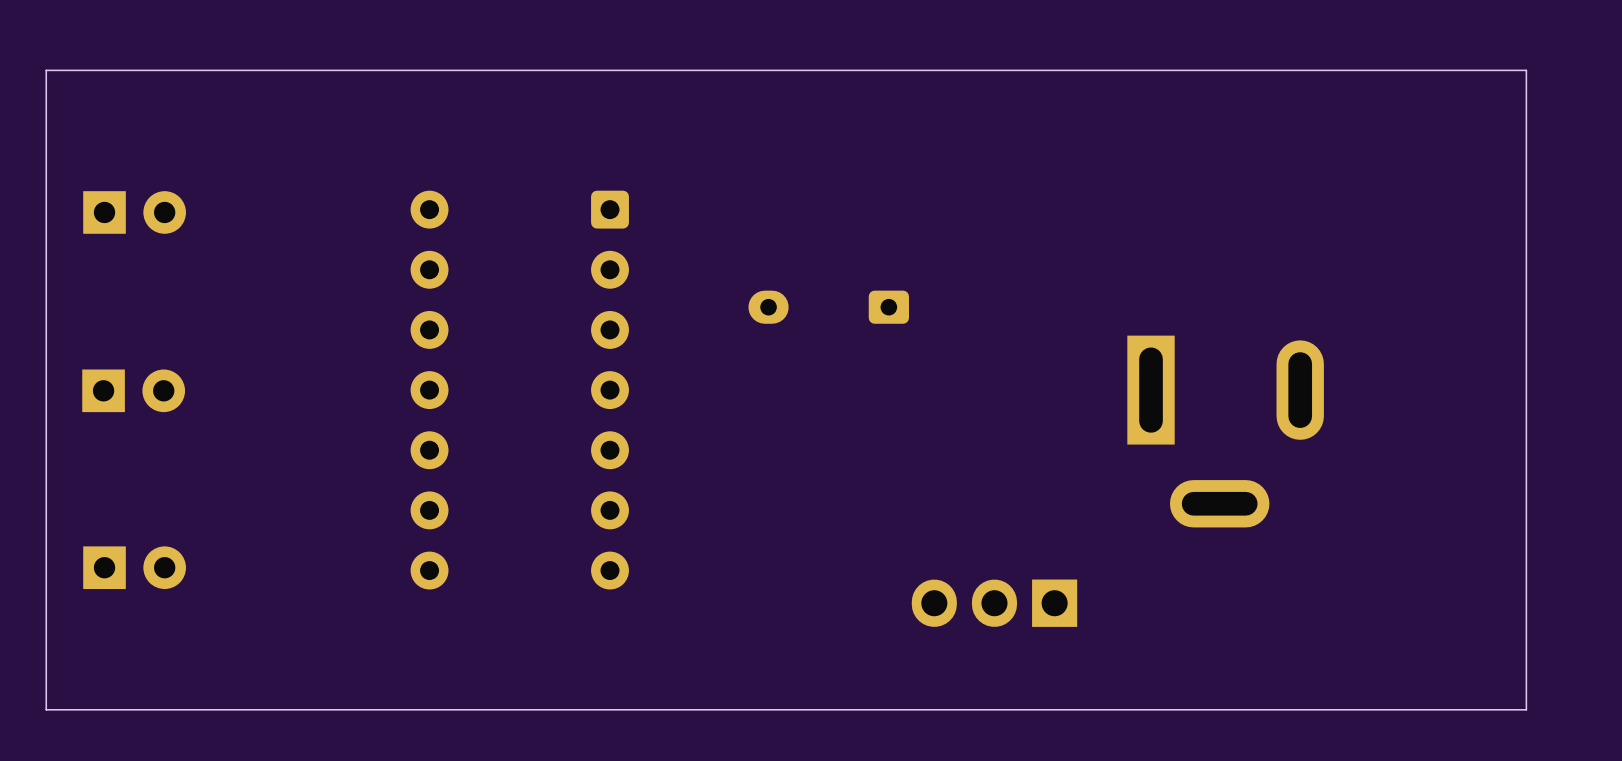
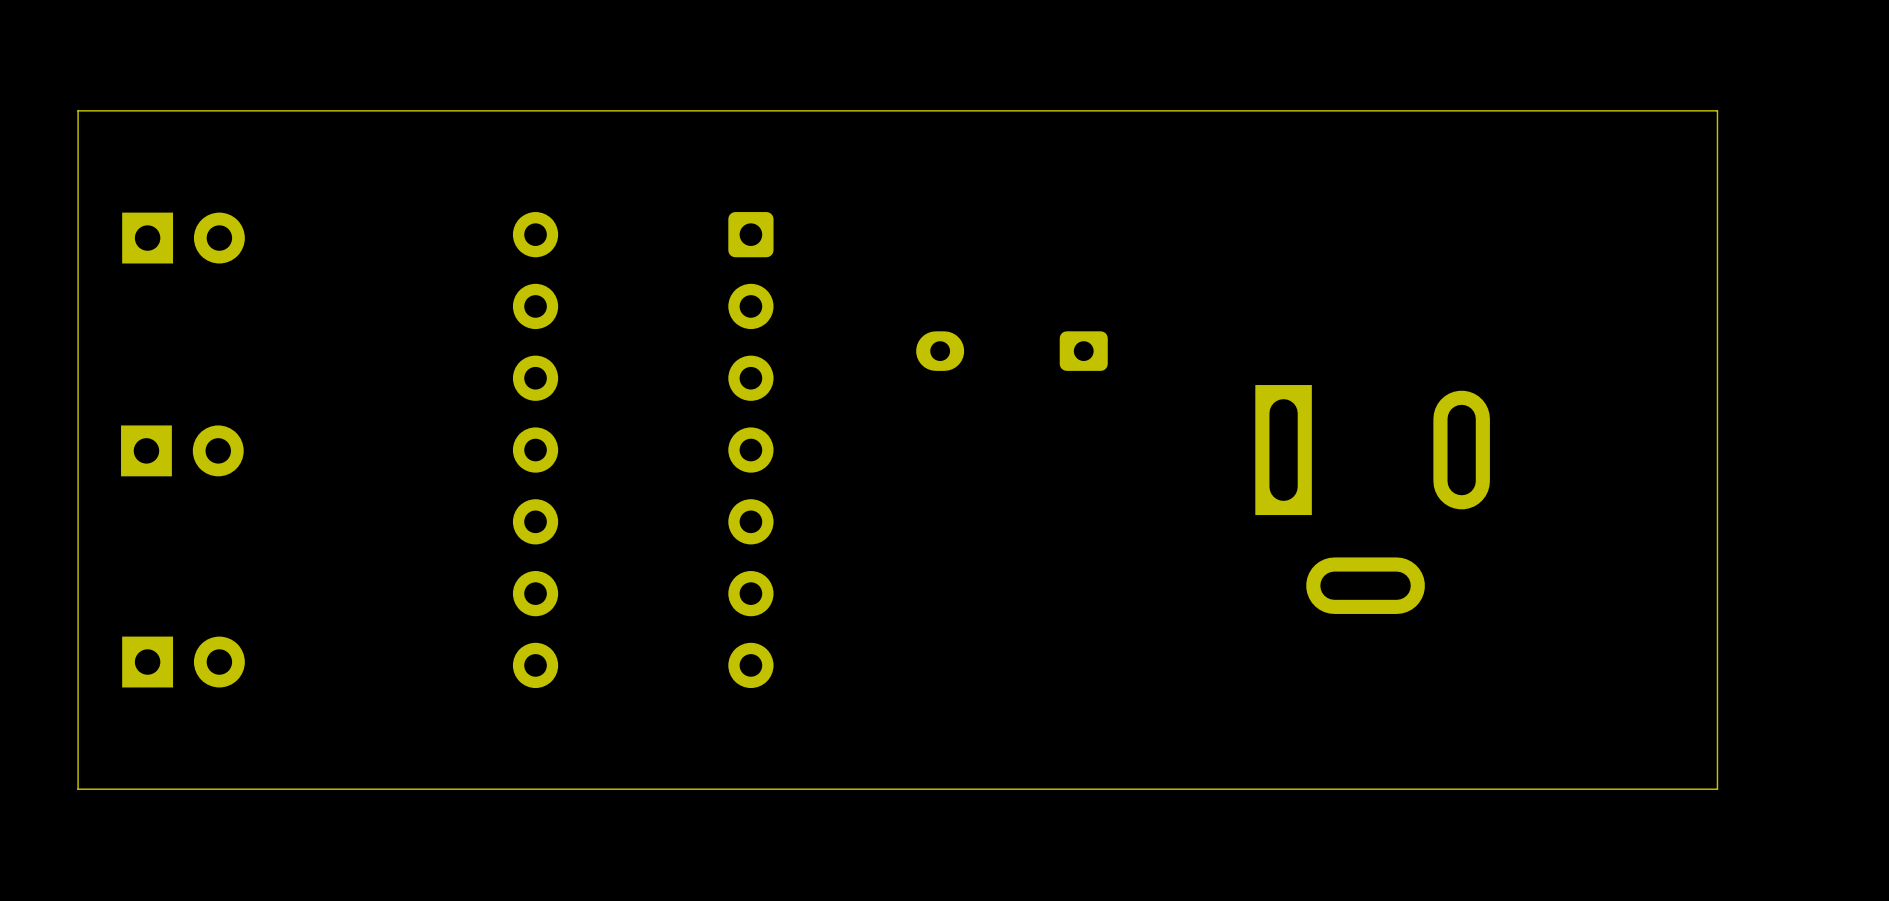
board edge: (46, 105) (46, 70) (1526, 70) (1526, 709) (46, 709) (46, 674) -> (78, 110) (1717, 110) (1717, 789) (78, 789)
part position: (1225, 431) -> (1372, 499)
part: (994, 603) -> none

